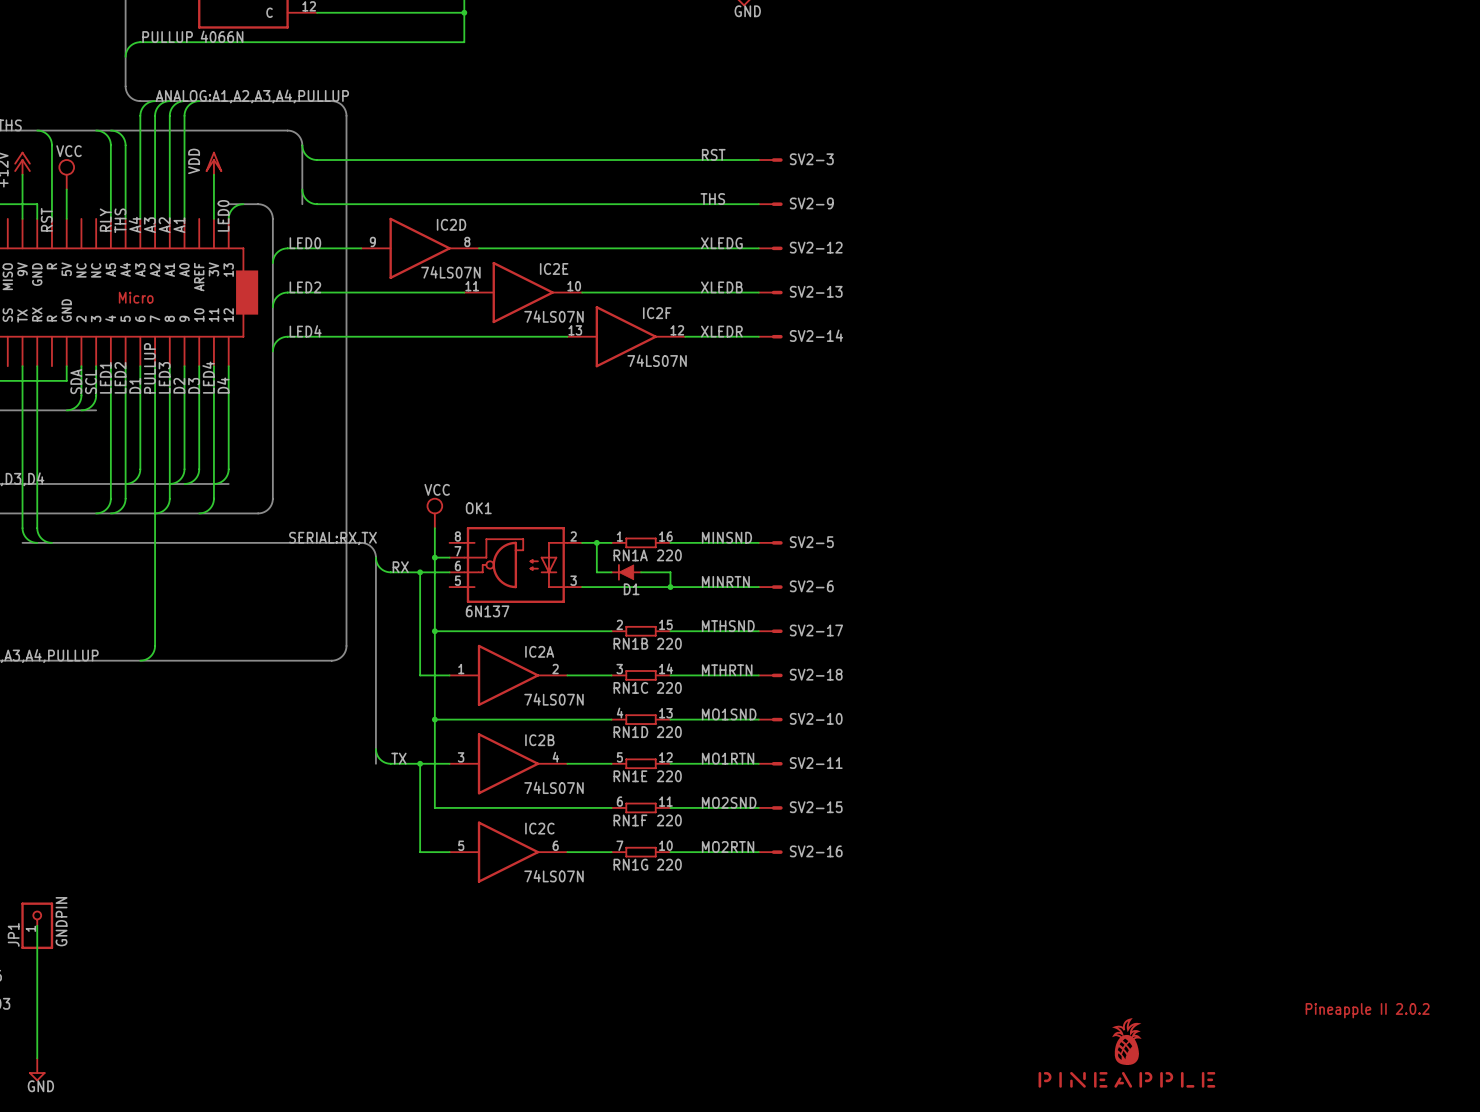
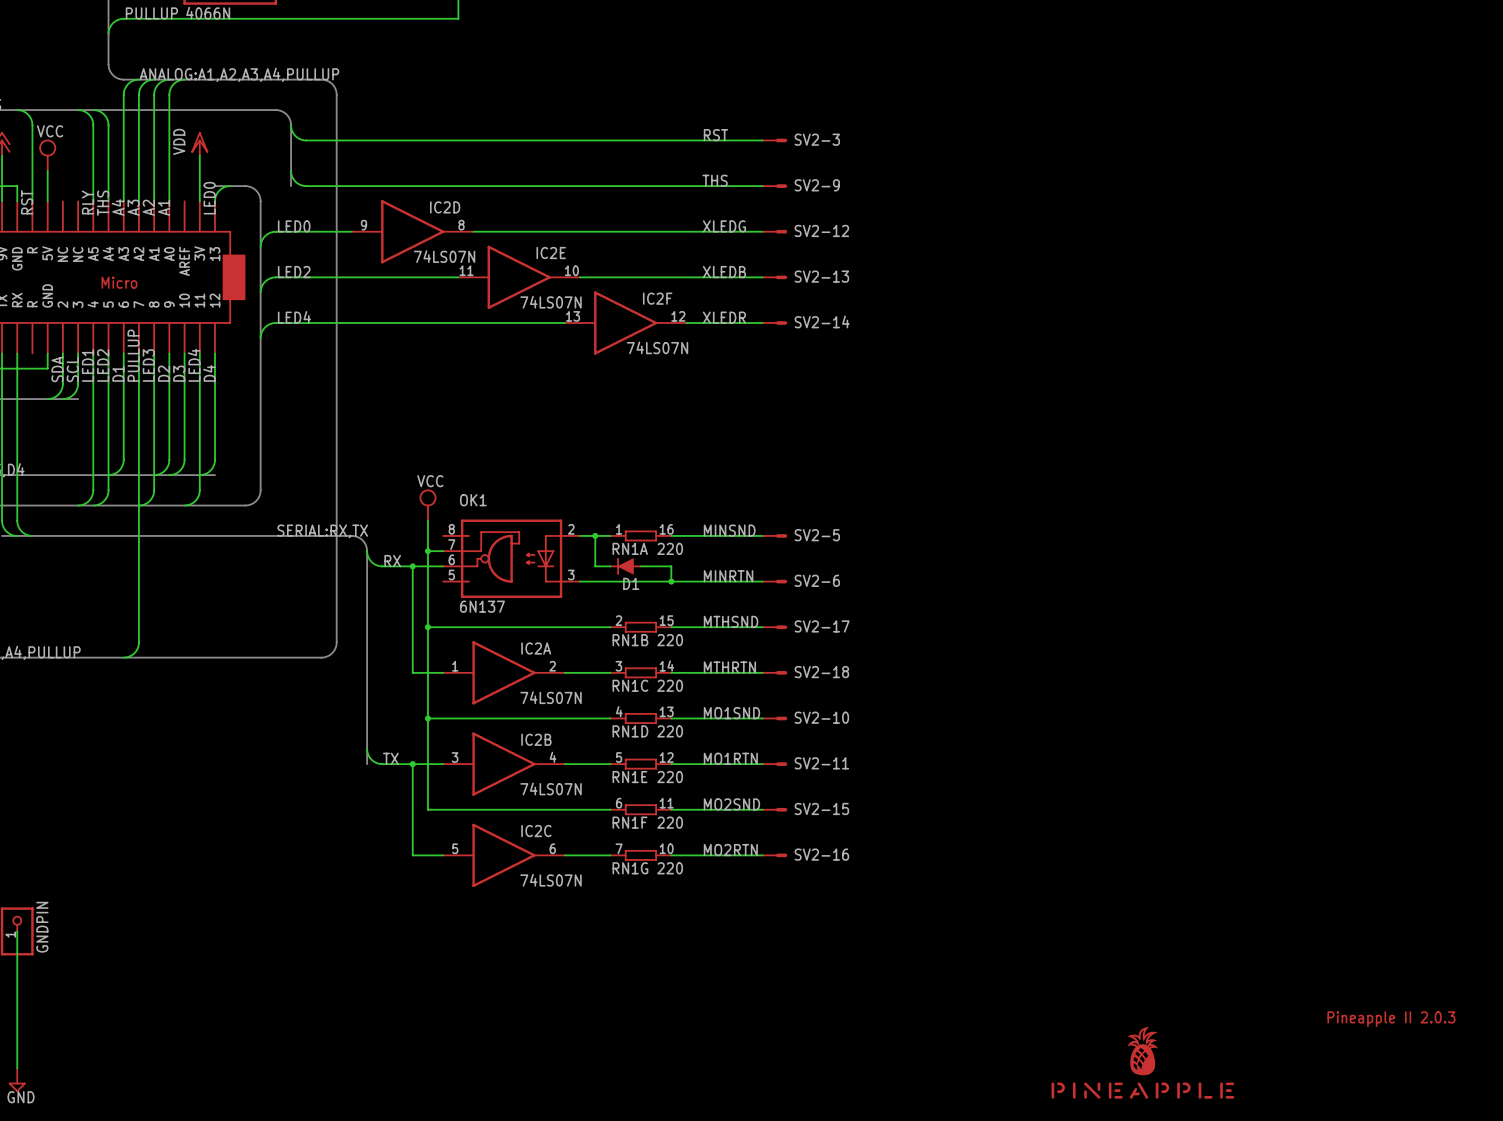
text: Pineapple II 2.0.2 (1367, 1010) -> Pineapple II 2.0.3 (1391, 1019)

